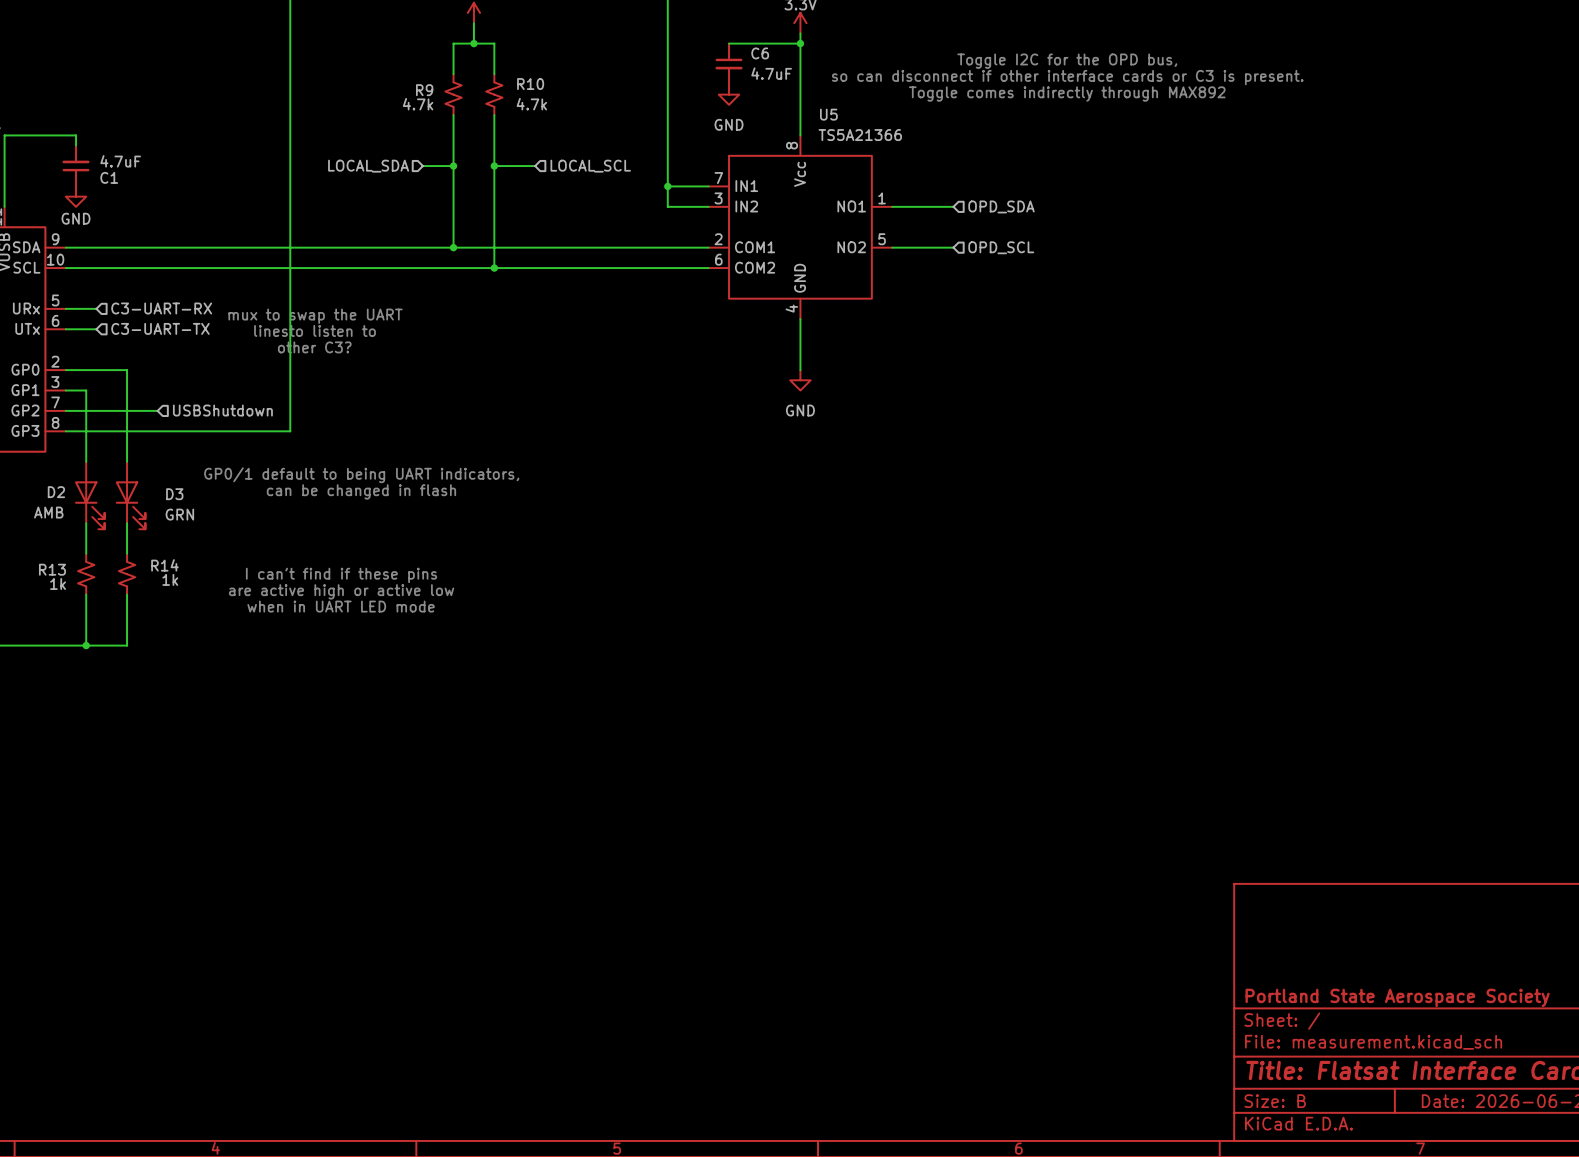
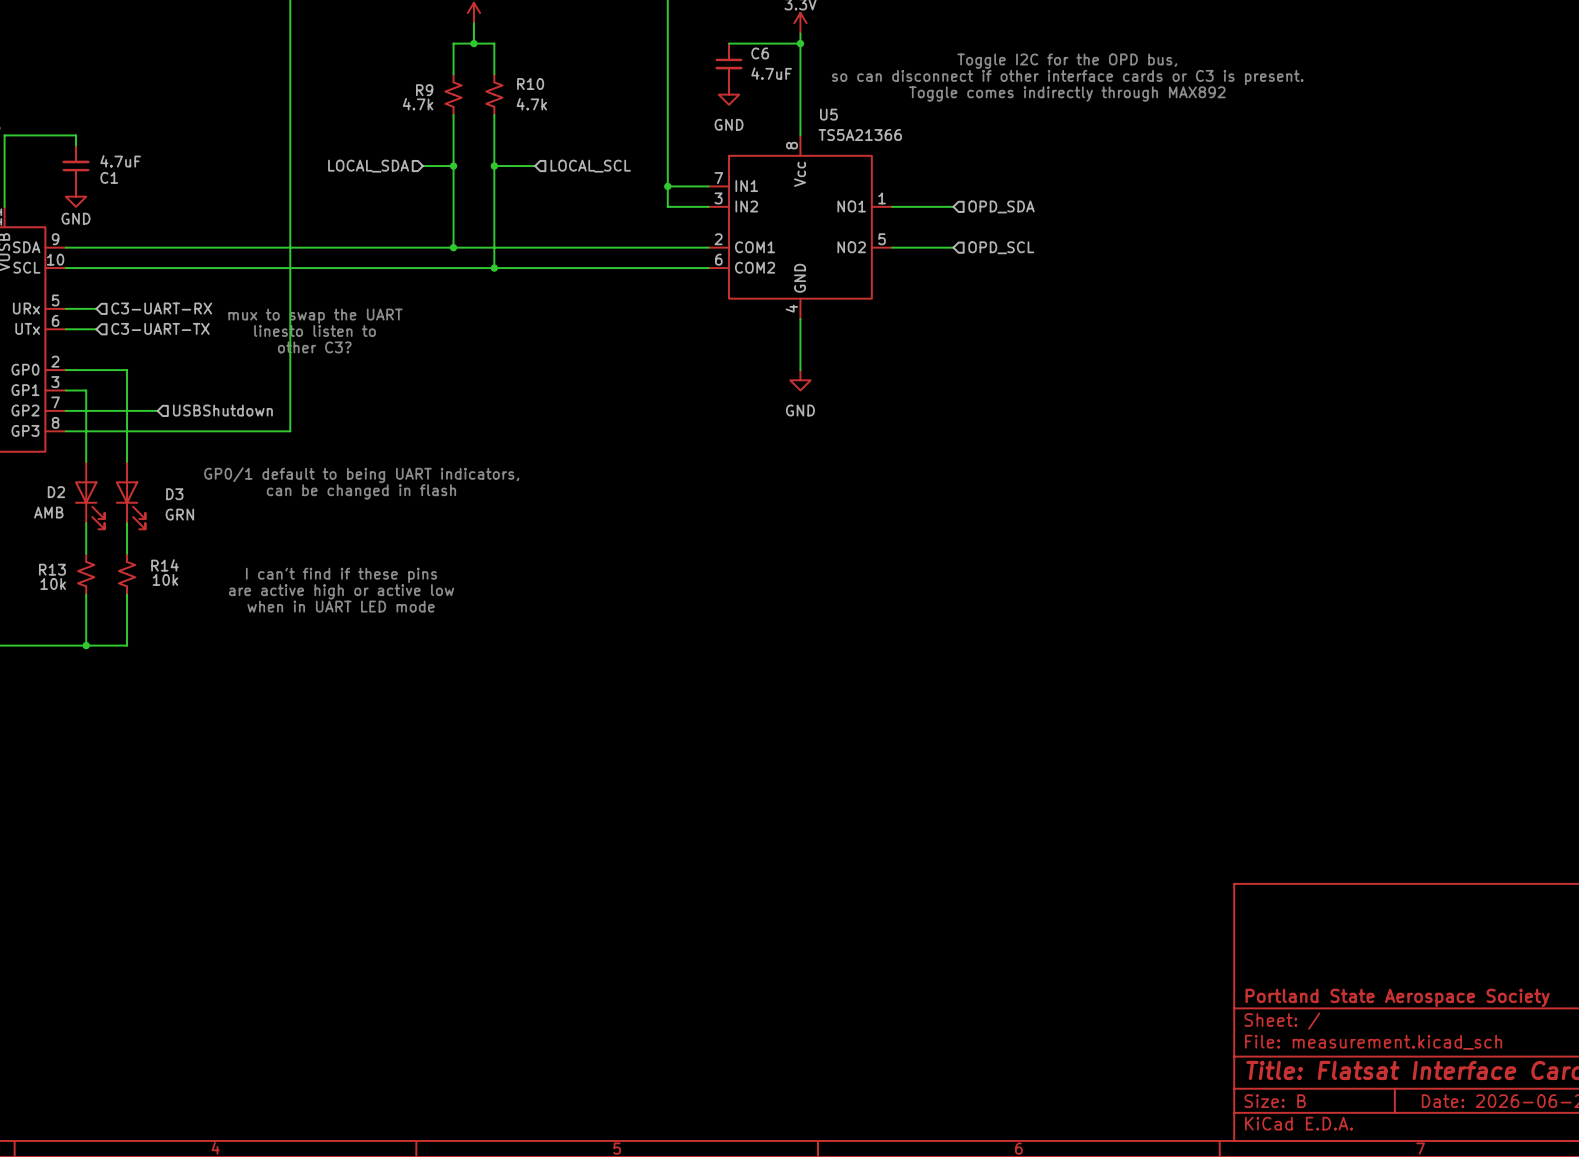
R14 value: 1k (170, 579) -> 10k (165, 579)
R13 value: 1k (58, 583) -> 10k (53, 583)

